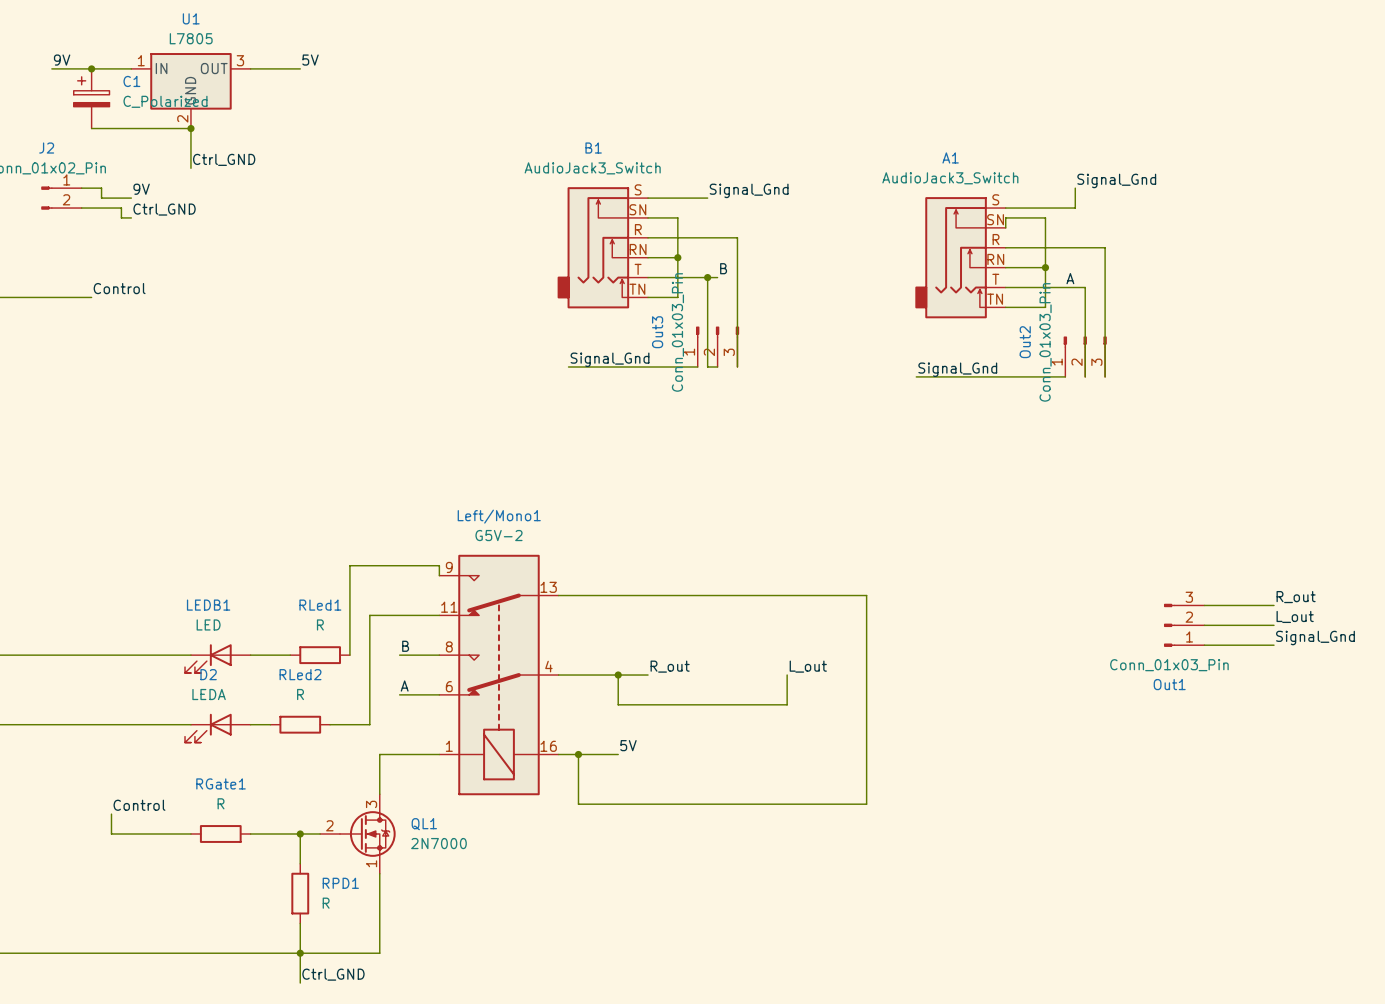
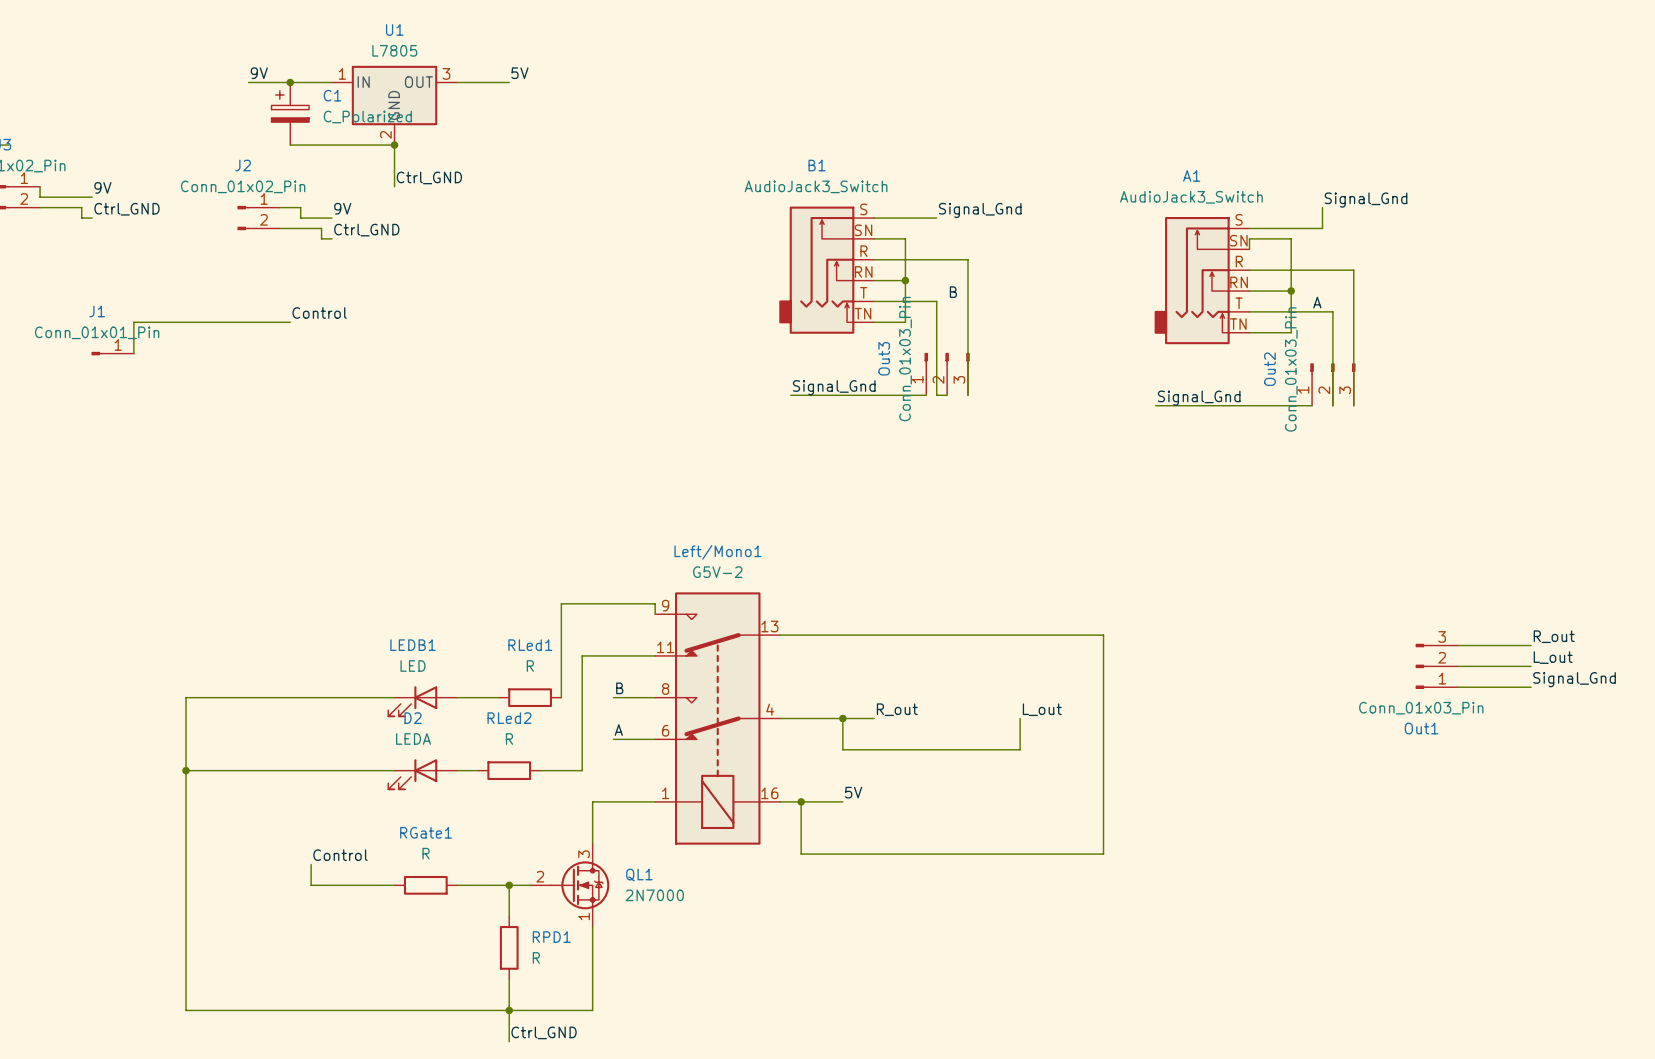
wire: (707, 277) (717, 277) -> none
junction: (707, 277) -> none

